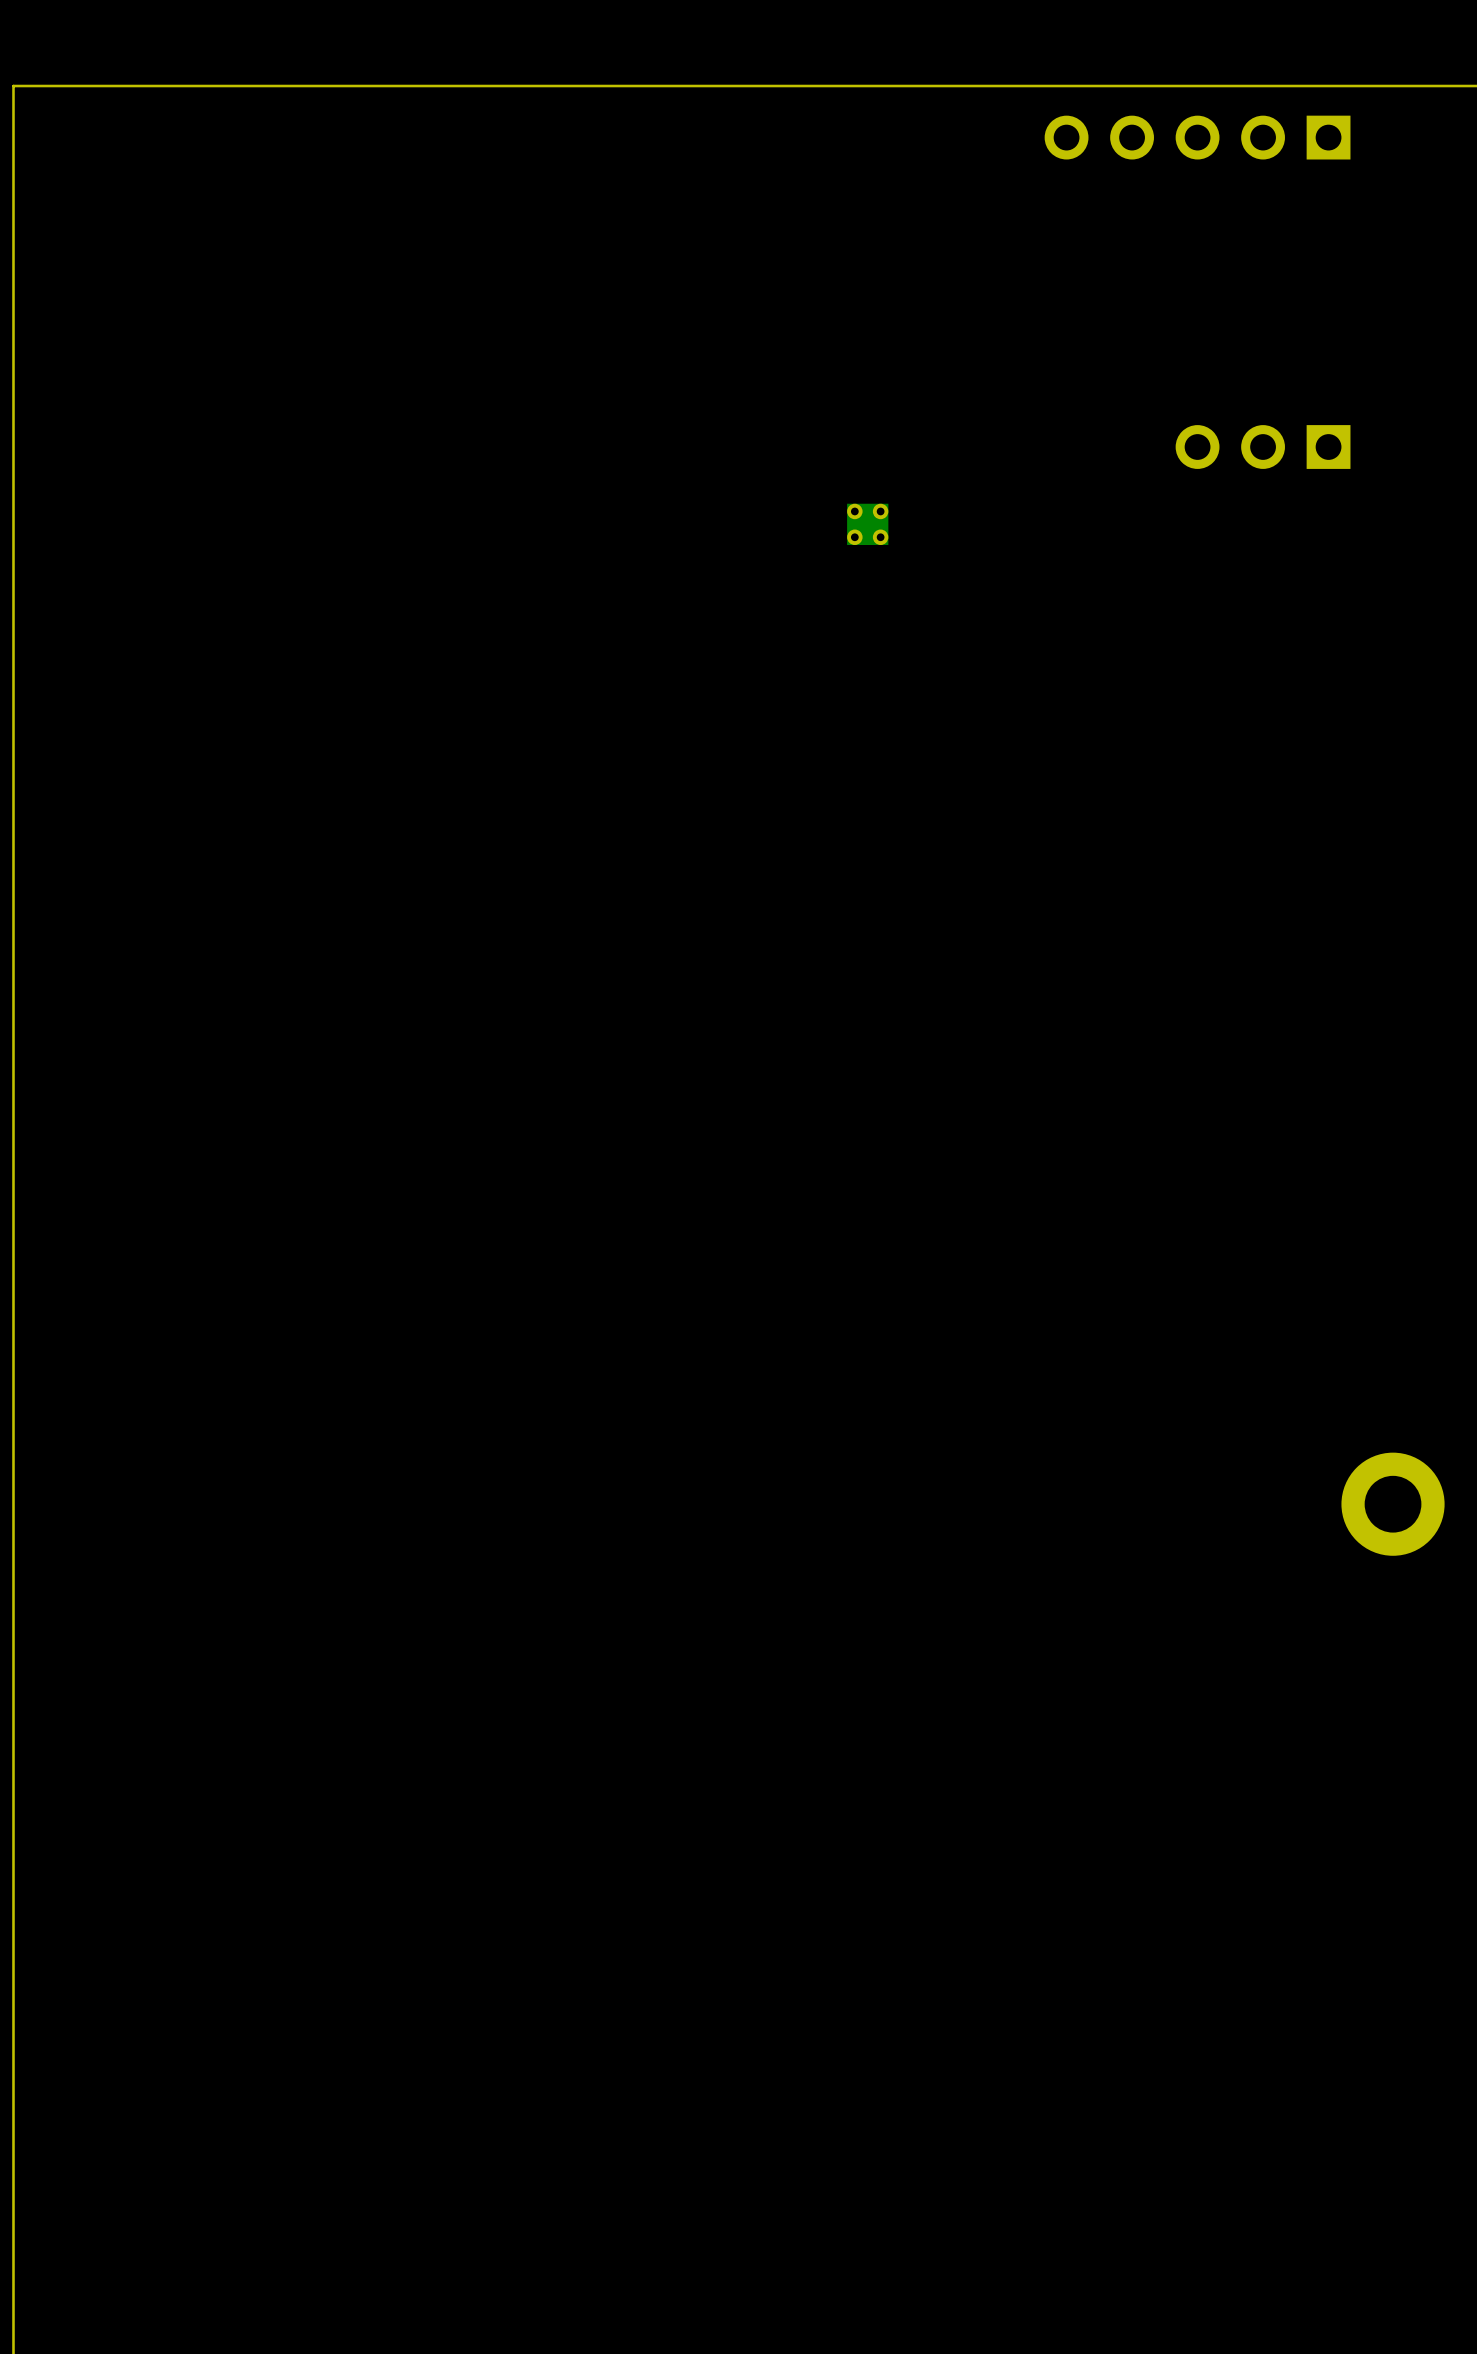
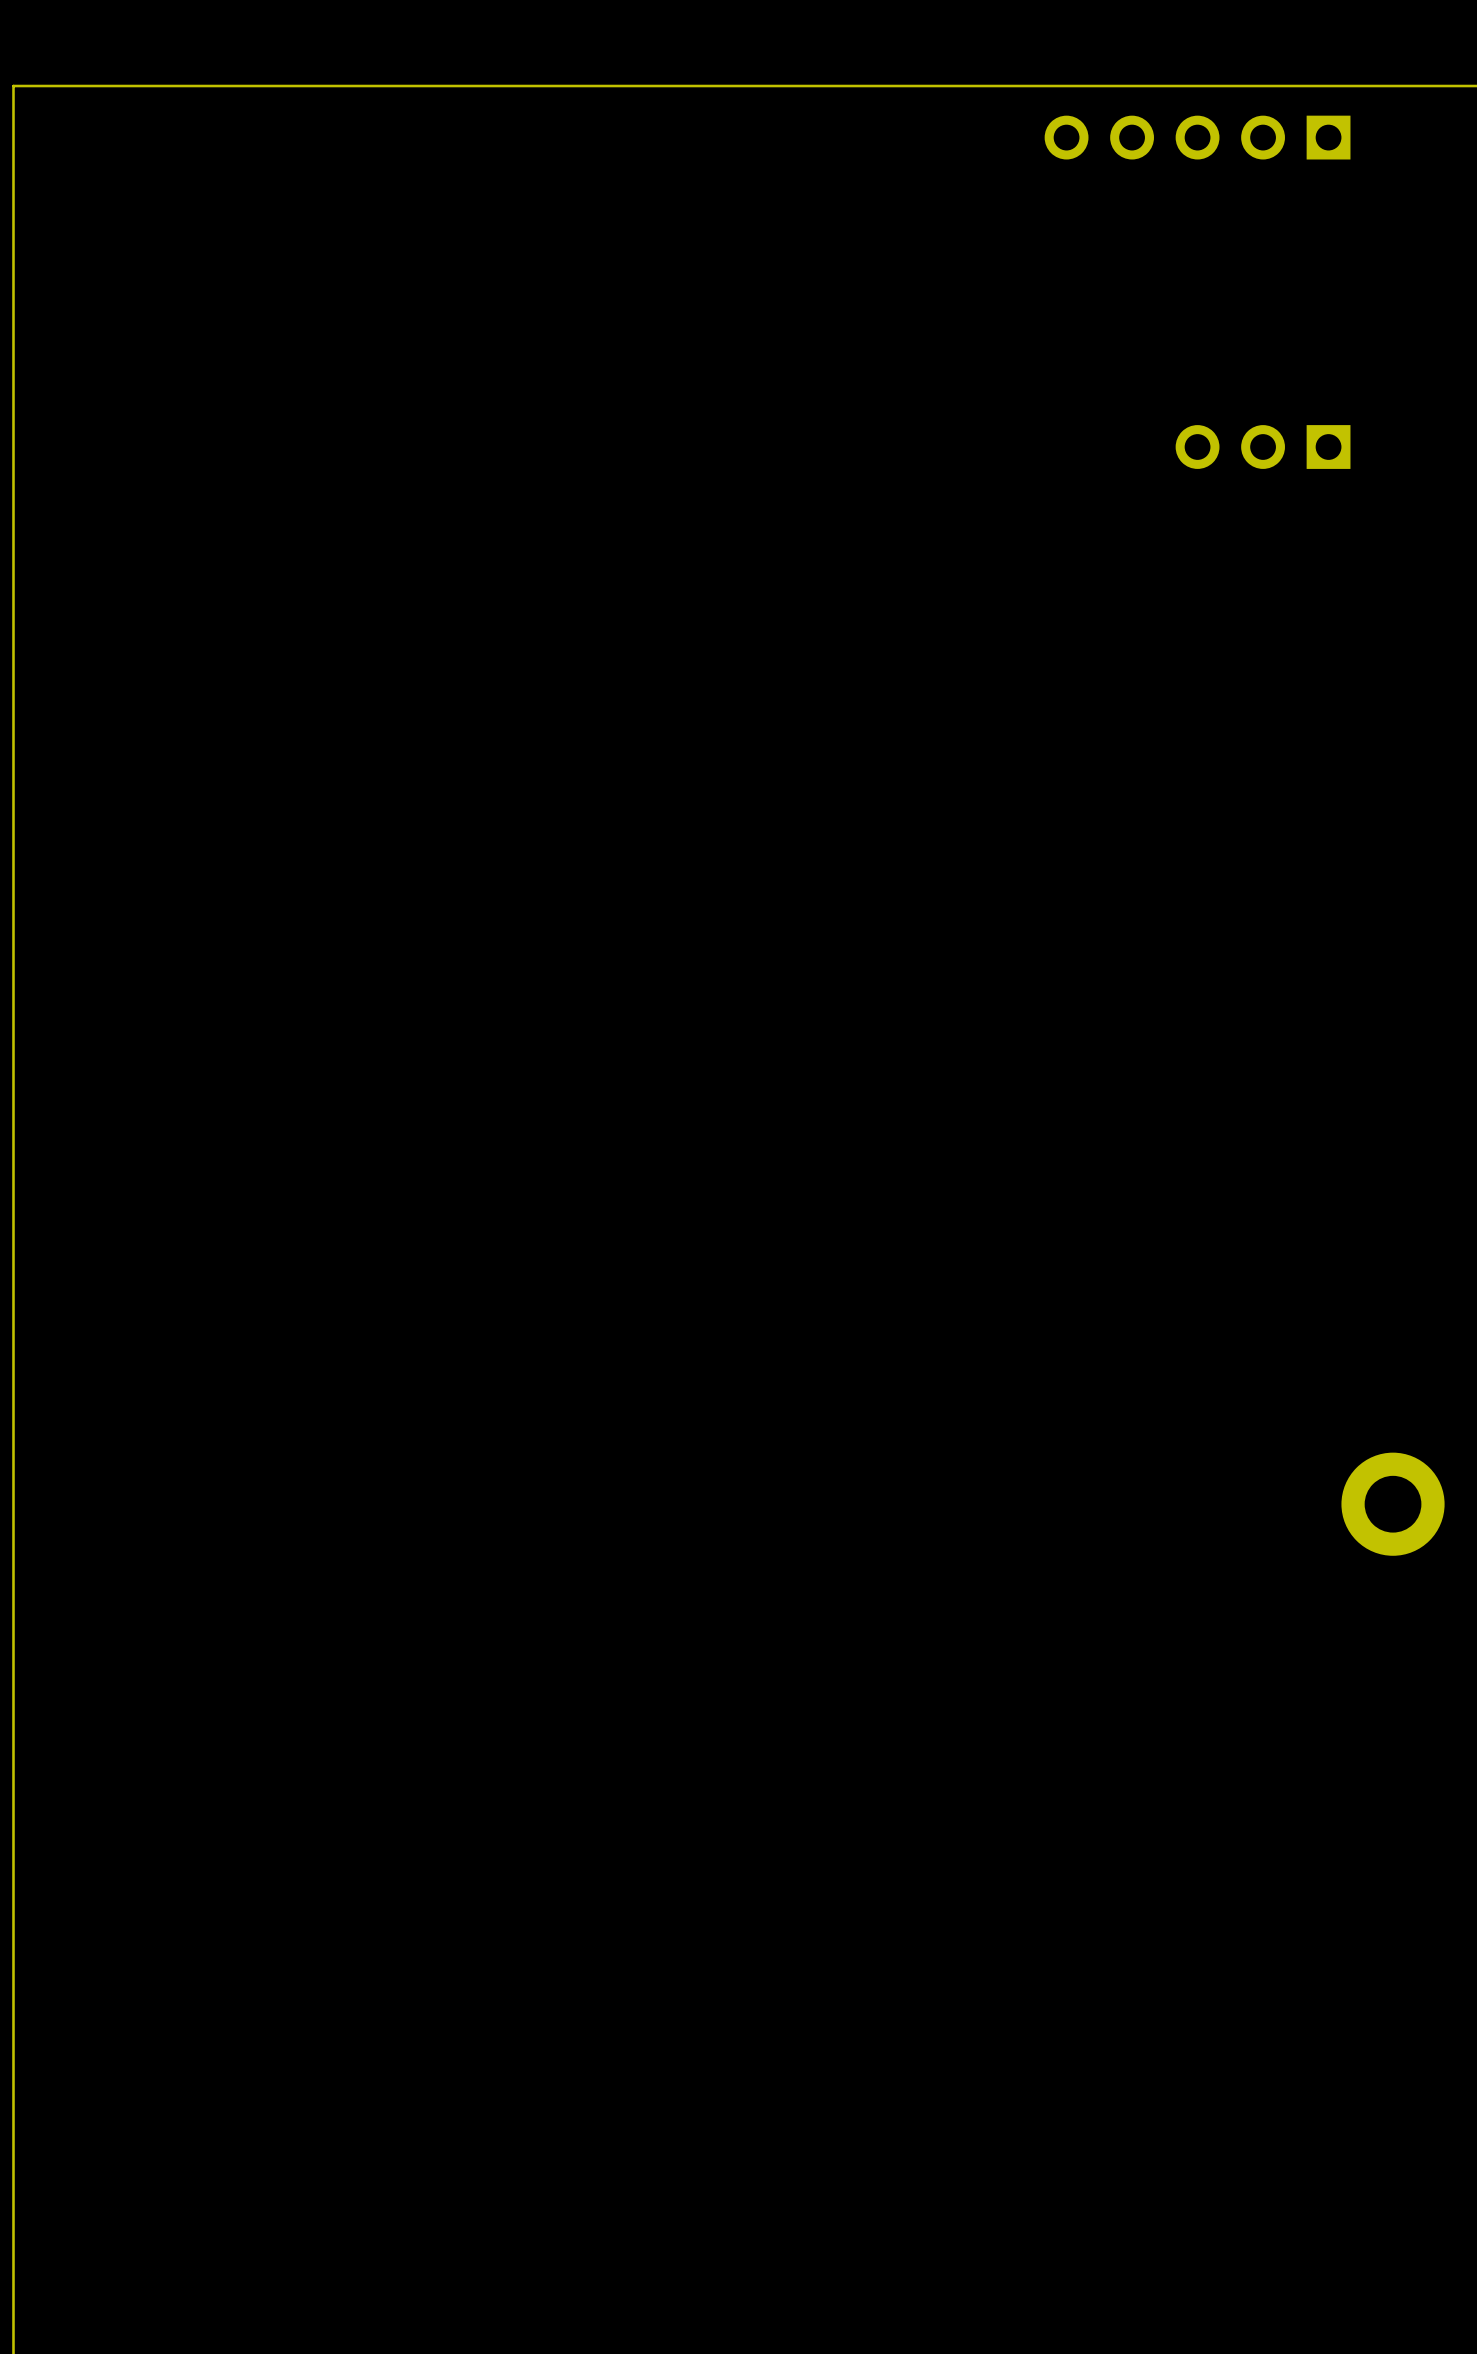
part: (867, 524) -> none

